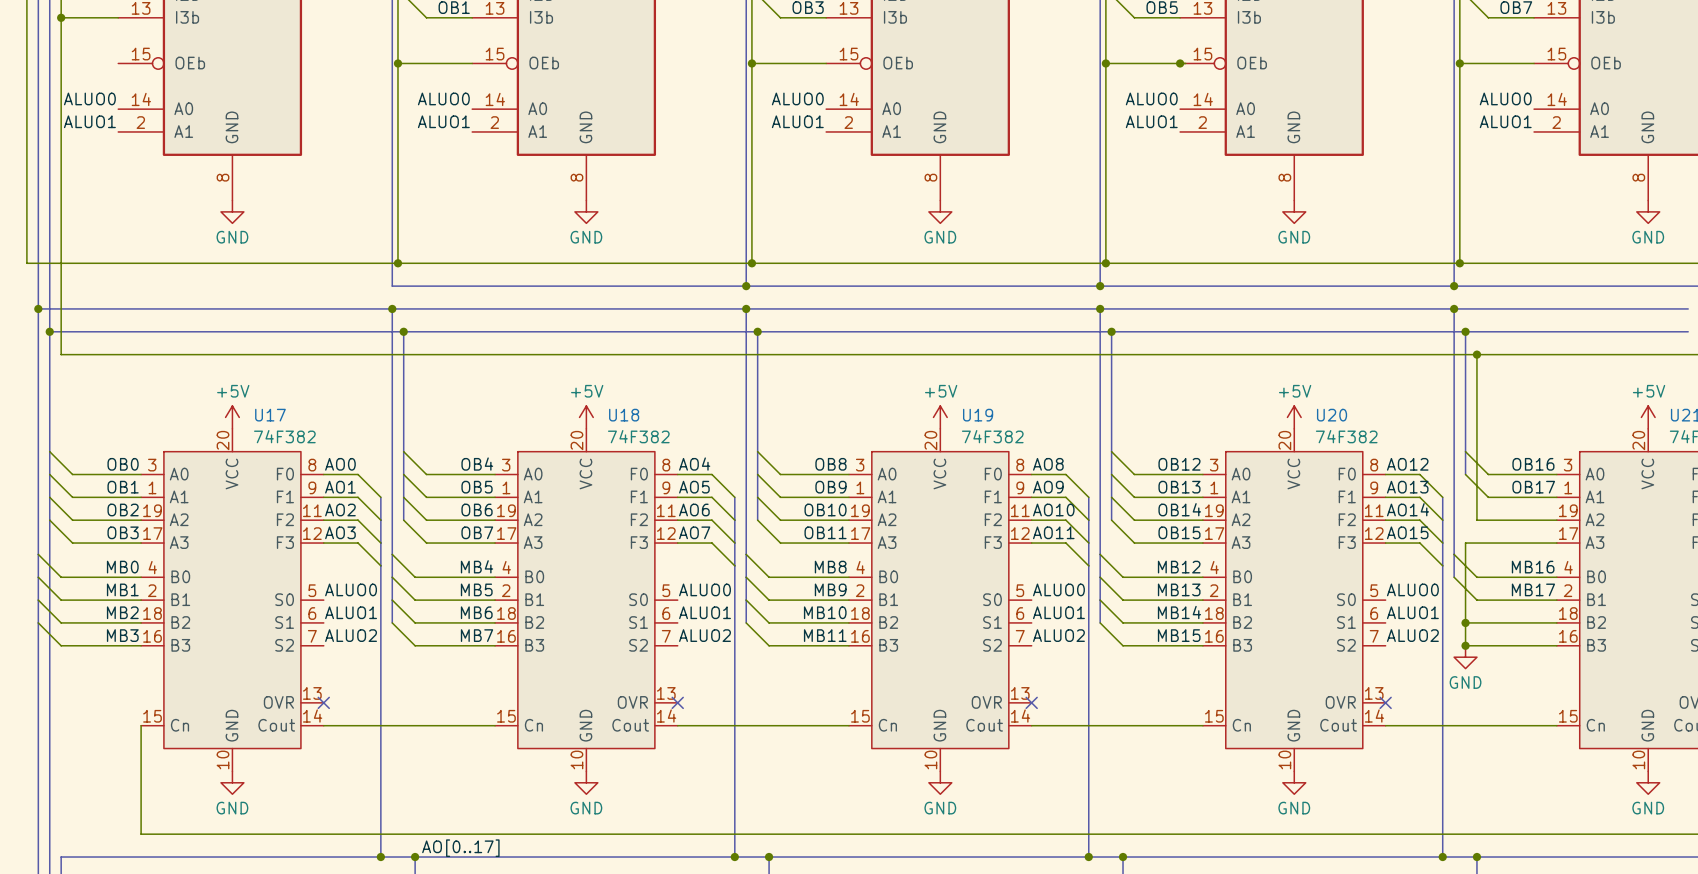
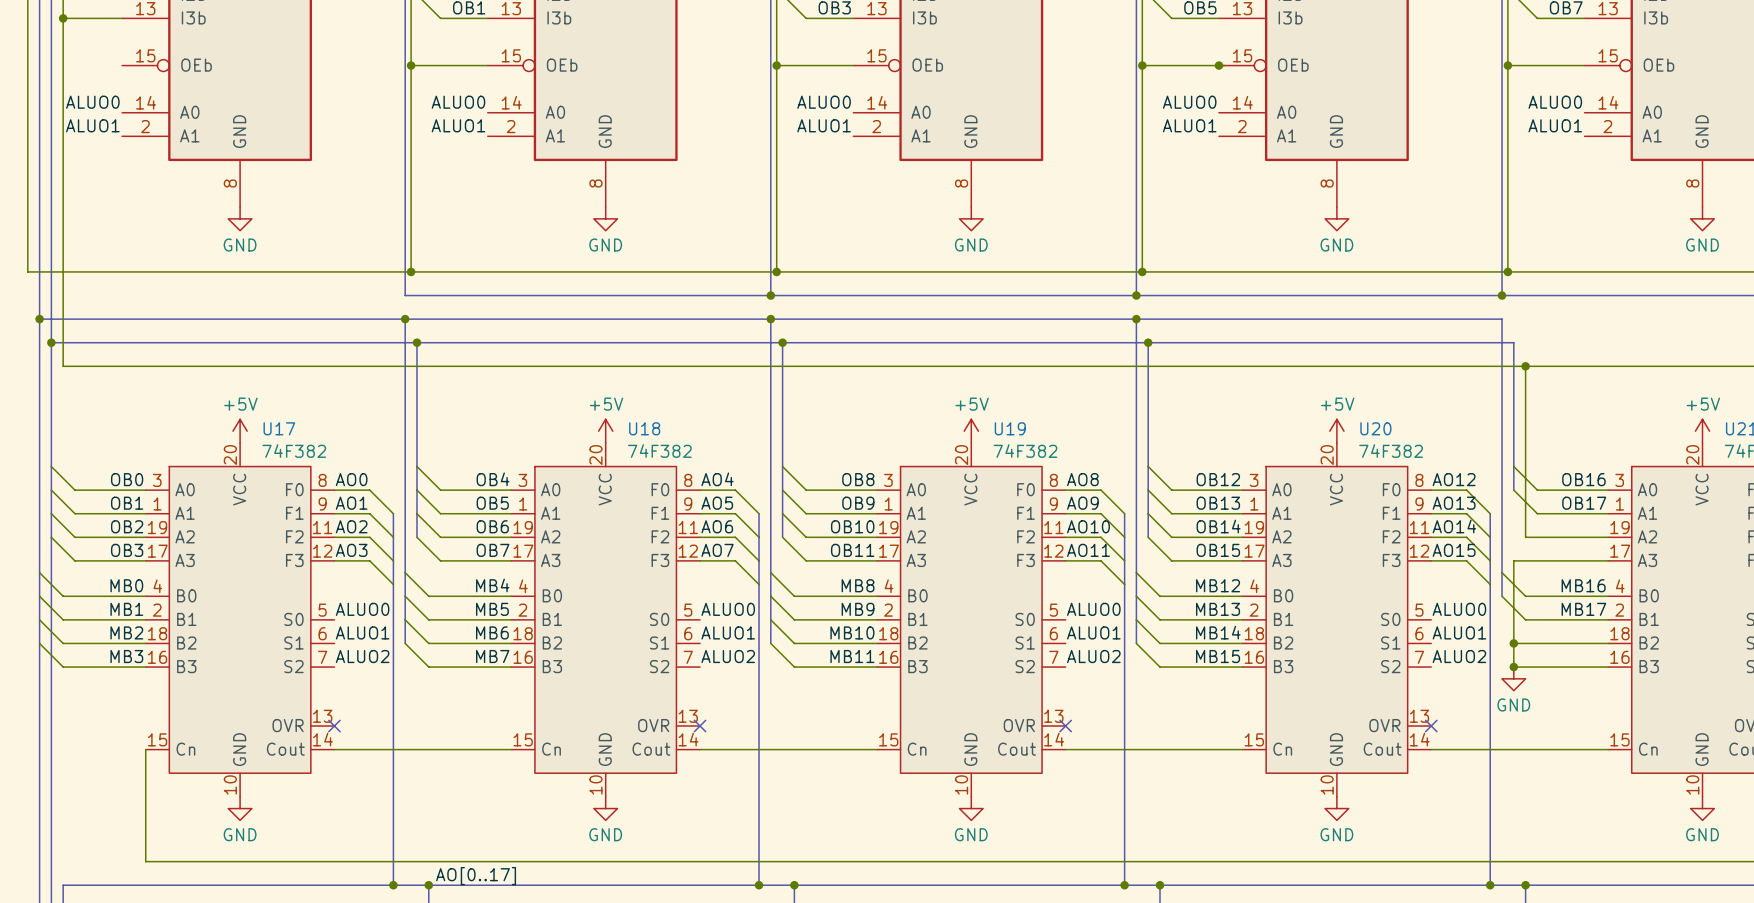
bus: (1454, 308) (1688, 308) -> none
junction: (1454, 308) -> none
bus: (1465, 331) (1688, 331) -> none
junction: (1465, 331) -> none

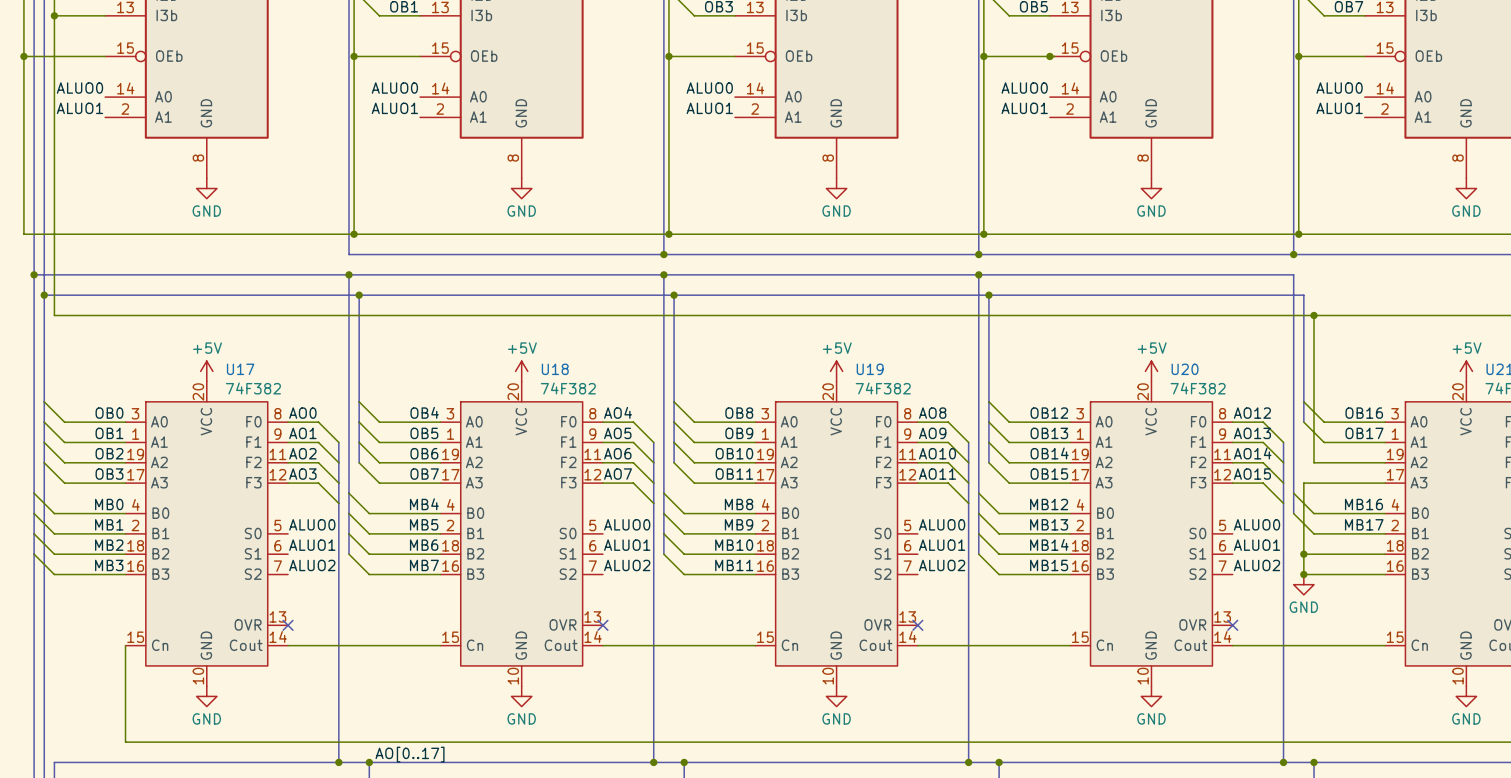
wire: none -> (23, 56) (105, 56)
junction: none -> (23, 56)

